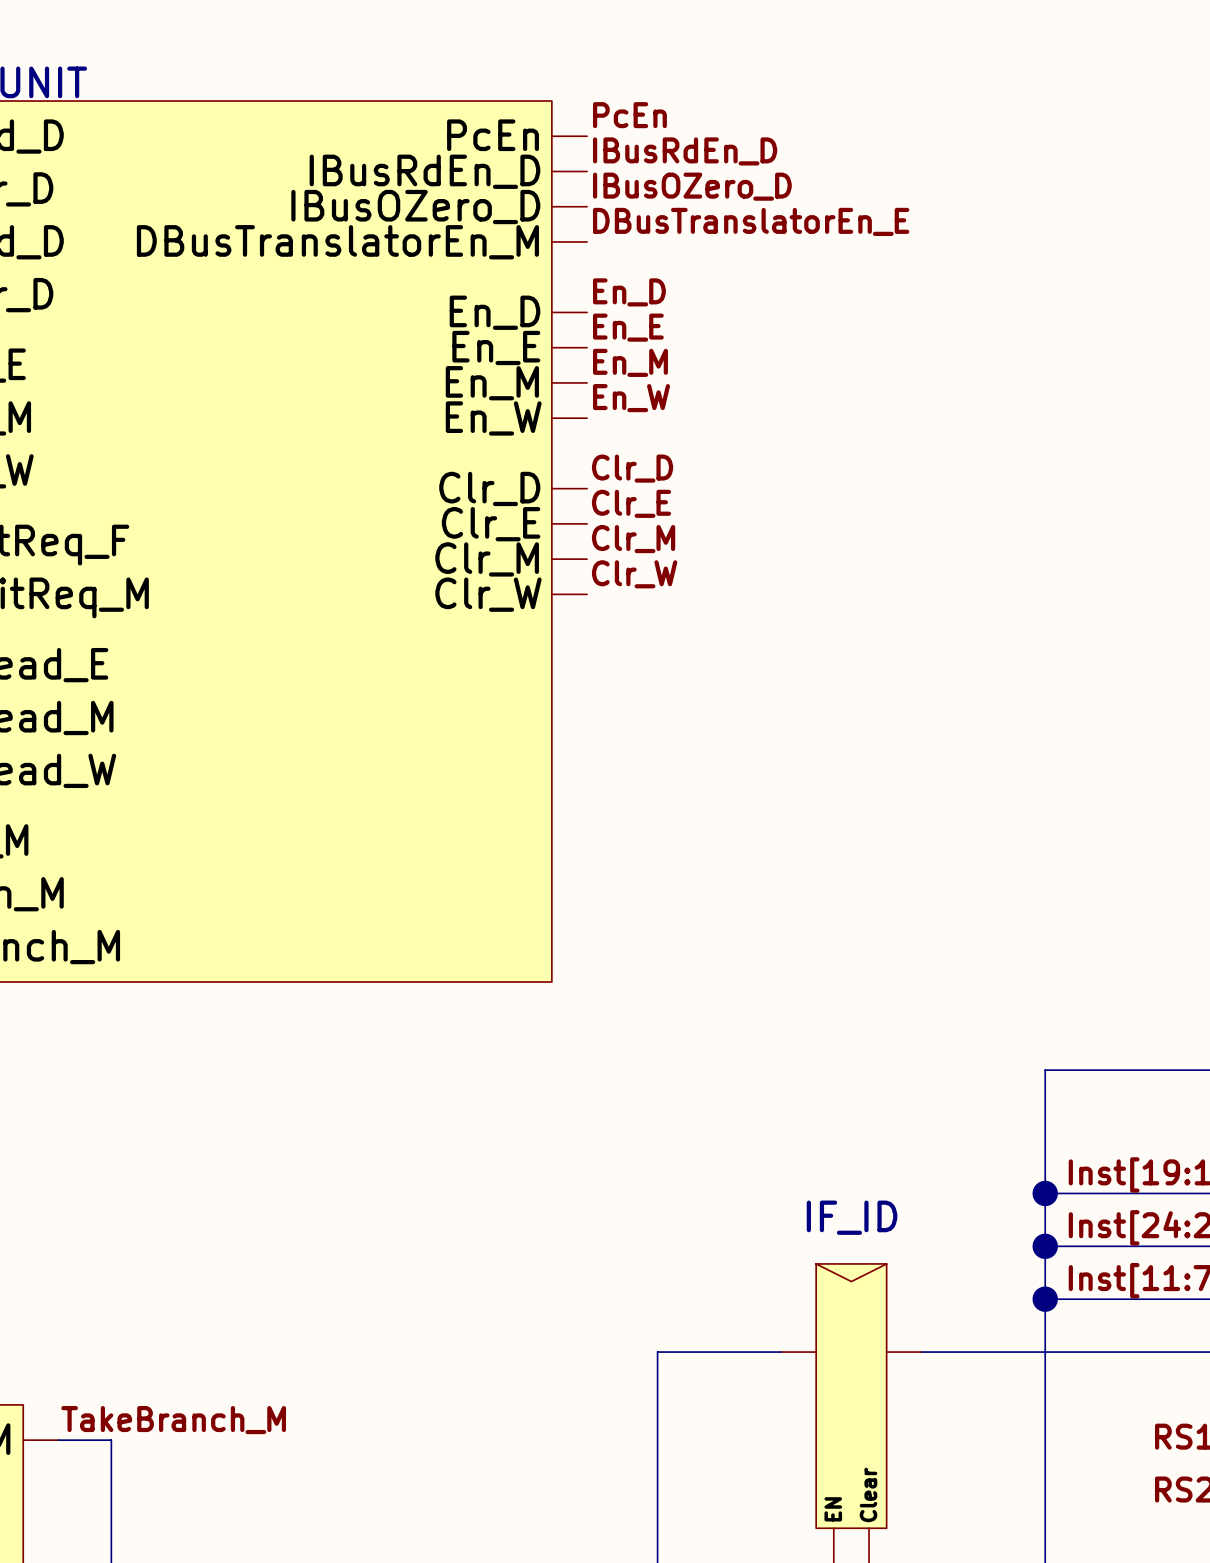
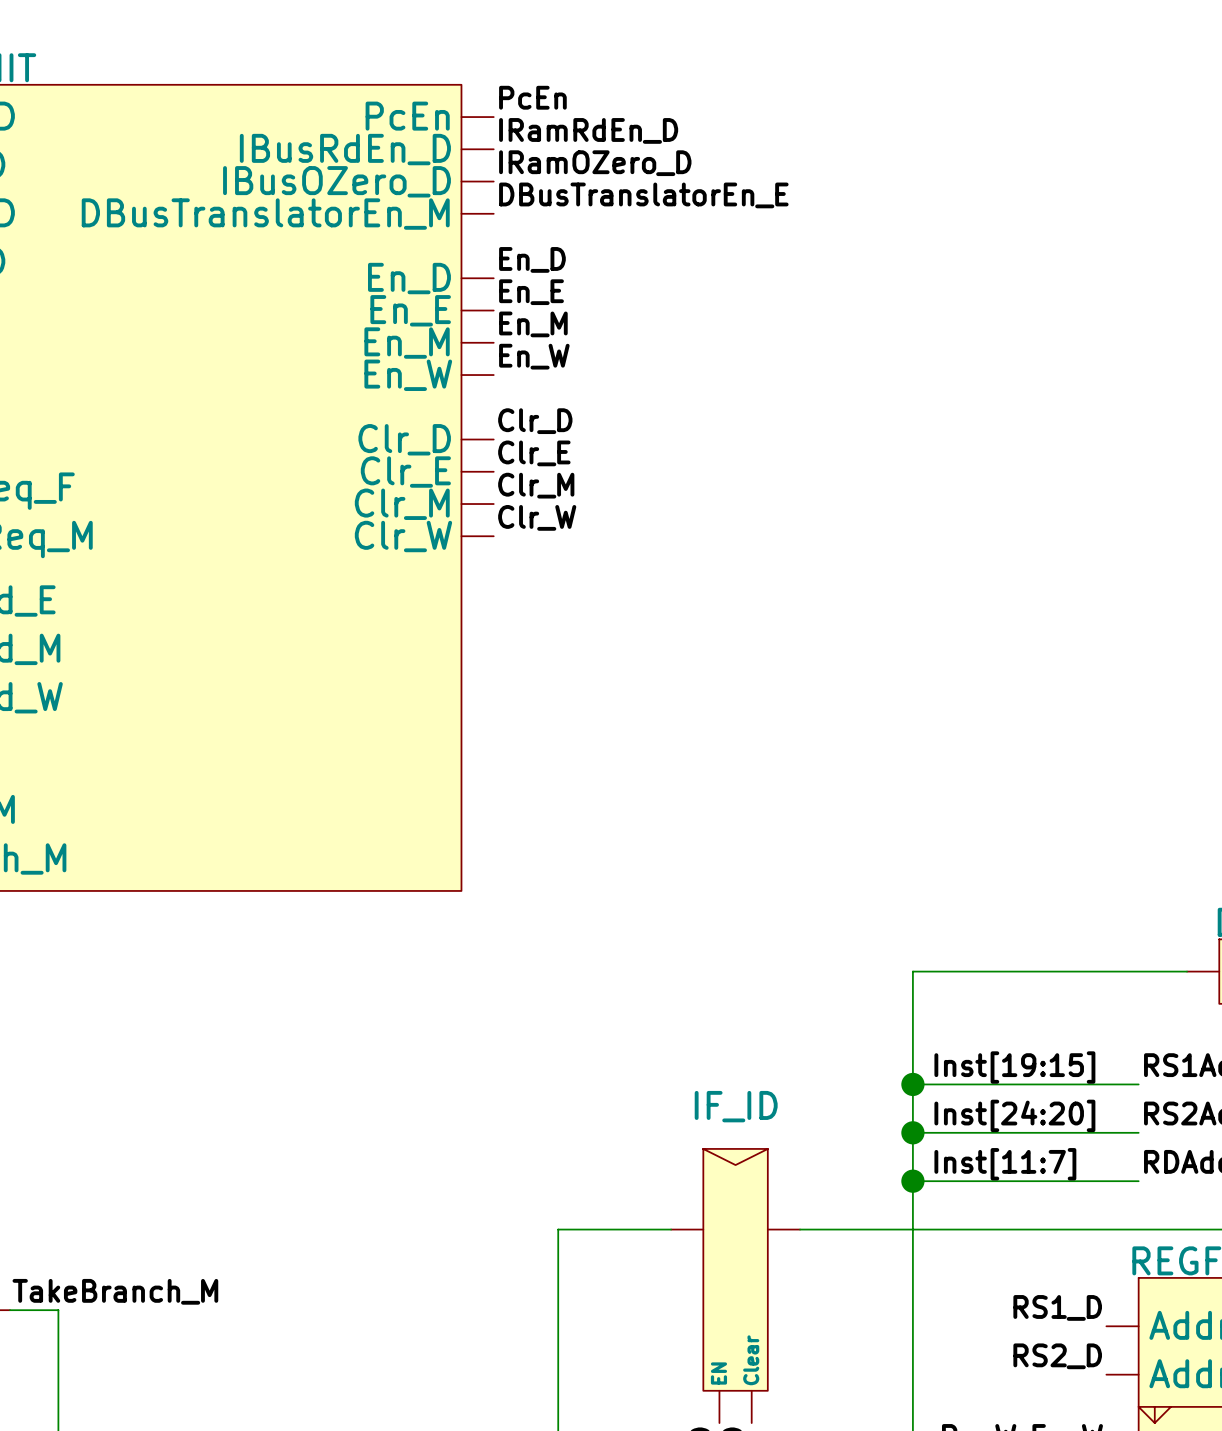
label: IBusRdEn_D (685, 151) -> IRamRdEn_D (588, 130)
label: IBusOZero_D (692, 186) -> IRamOZero_D (595, 163)

